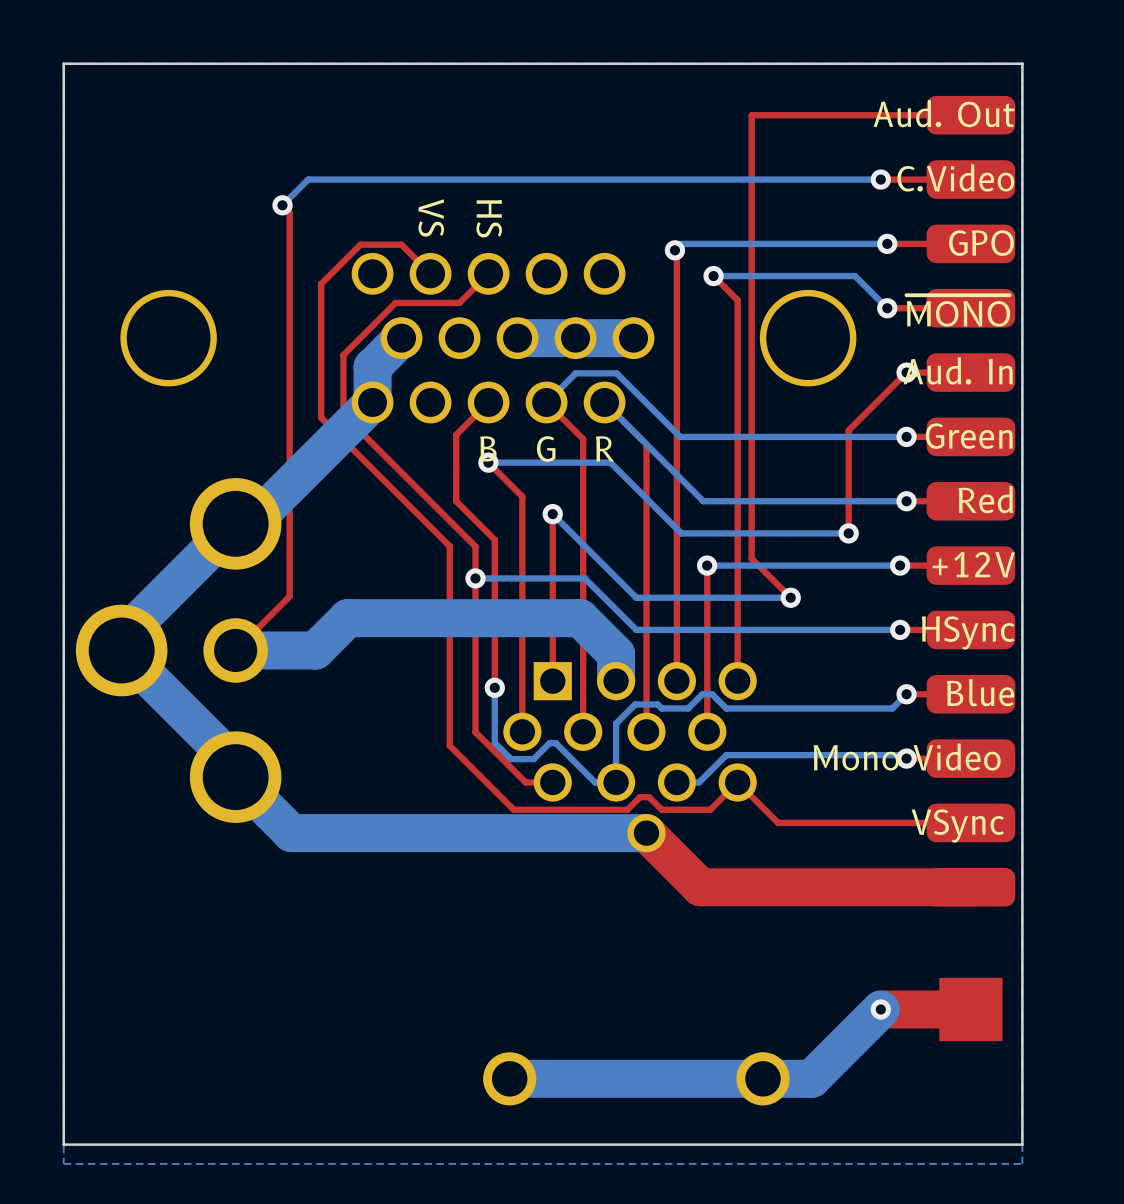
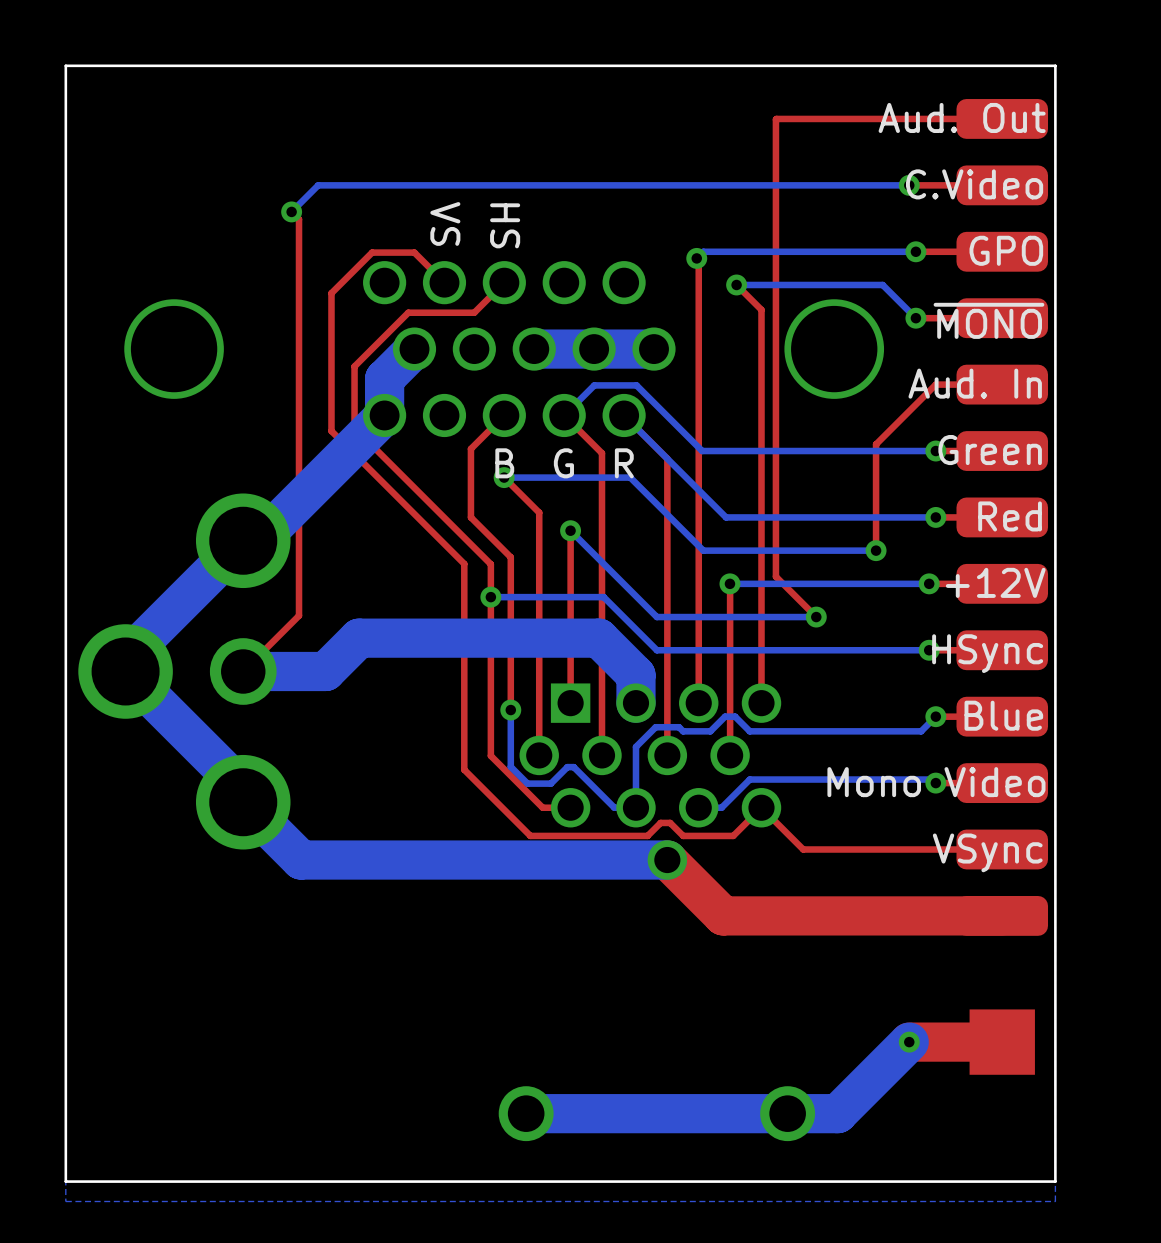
via: (906, 372) -> none

